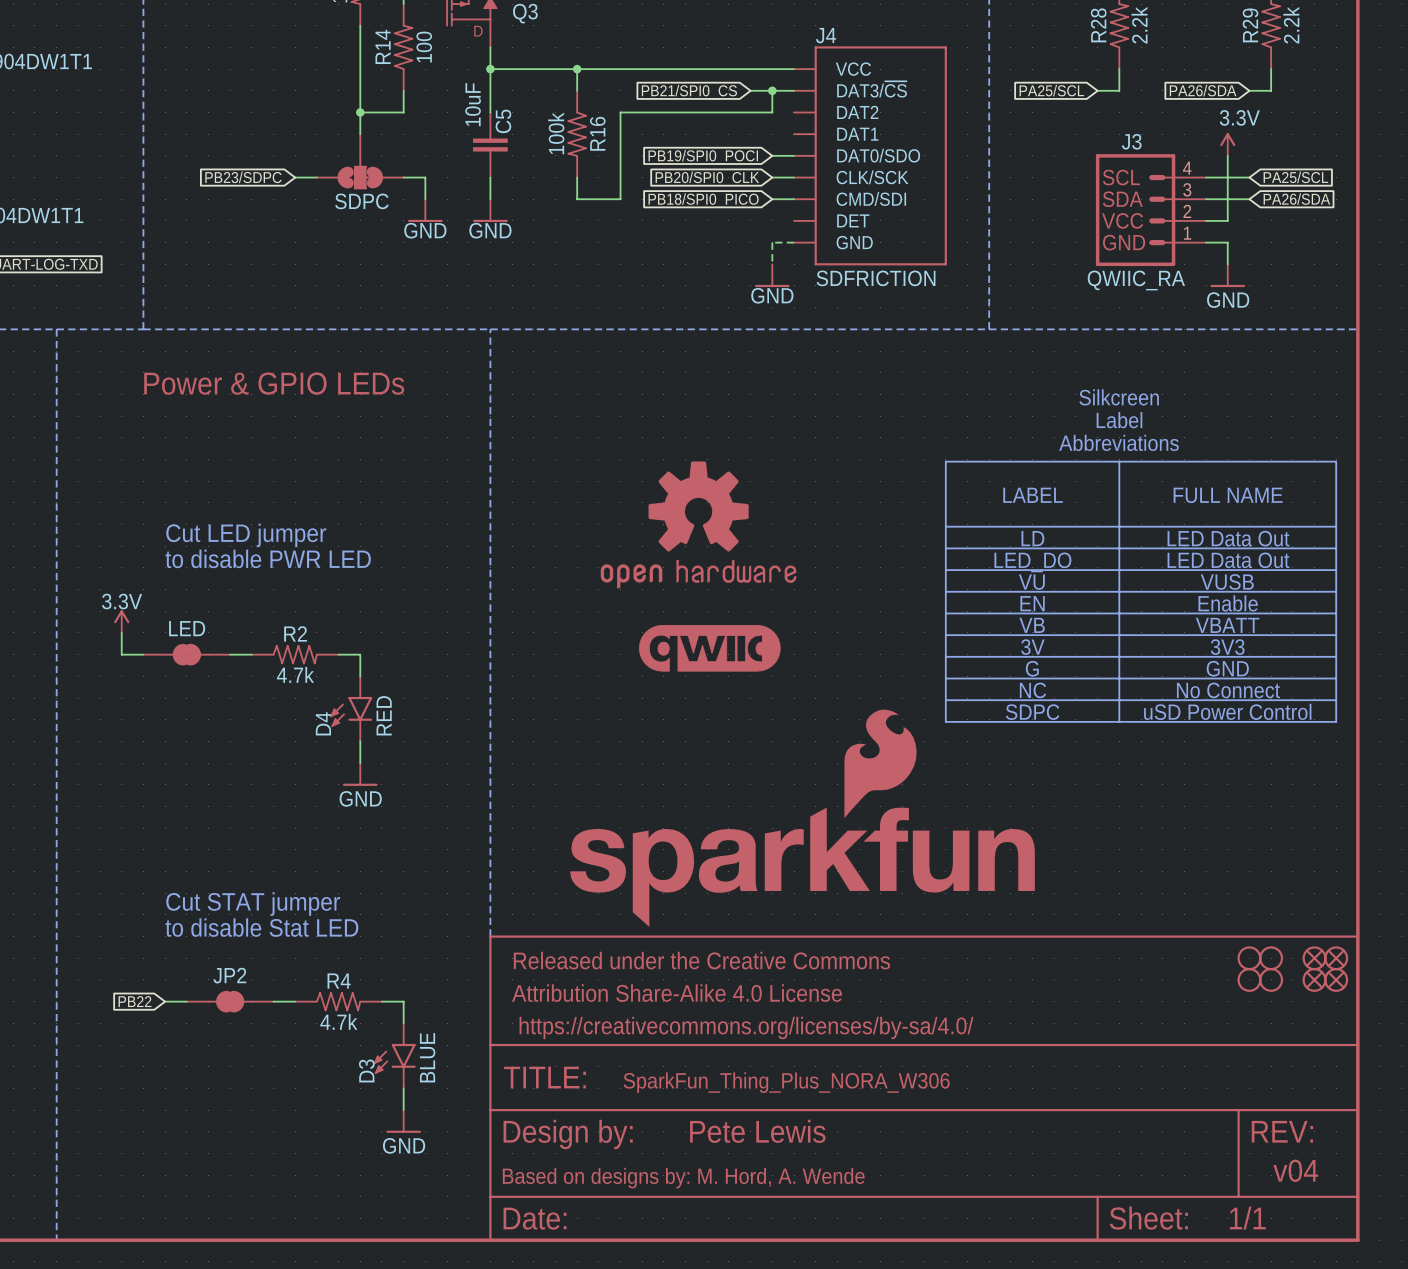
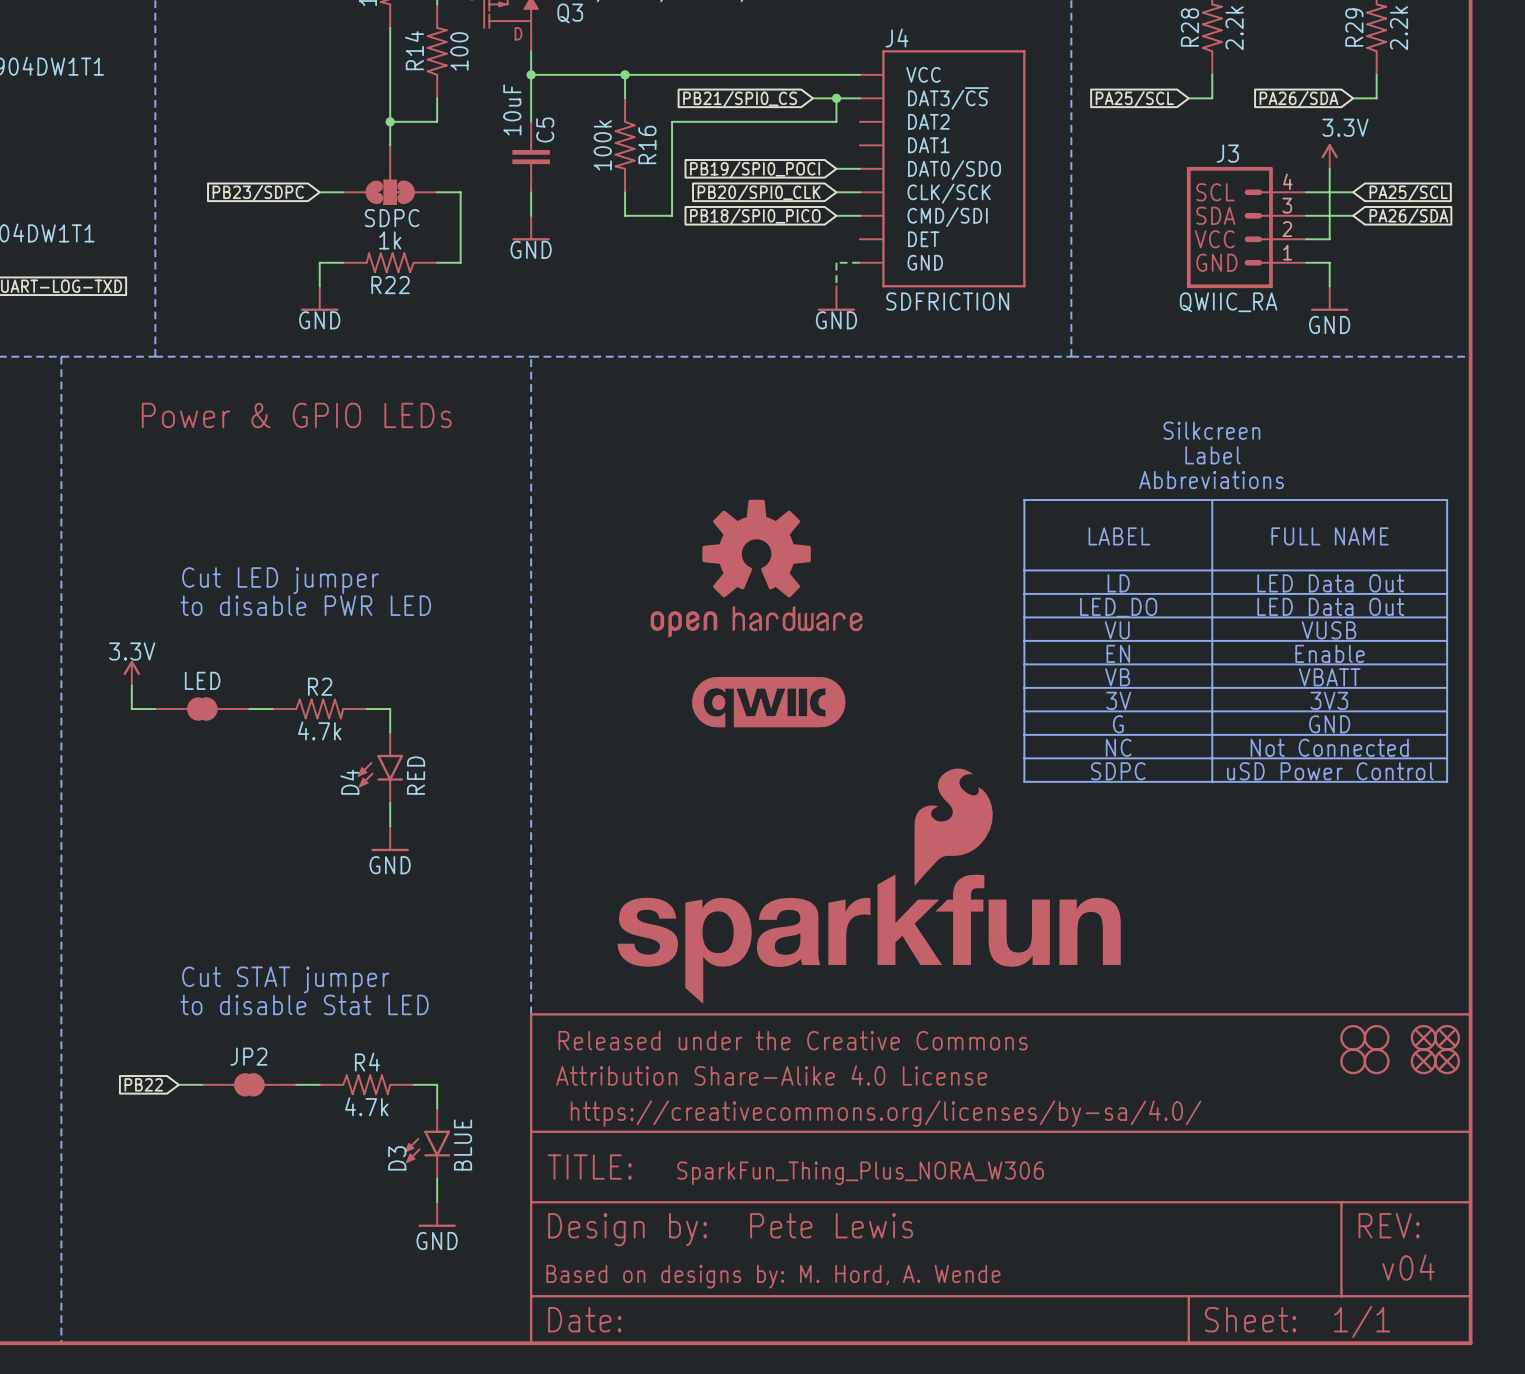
wire: none -> (460, 215) (460, 262) (437, 262)
power symbol position: GND (425, 210) -> GND (319, 298)
wire: none -> (343, 262) (319, 262) (319, 286)
R22: none -> 1k (390, 262)
text: No Connect (1228, 690) -> Not Connected (1329, 747)

